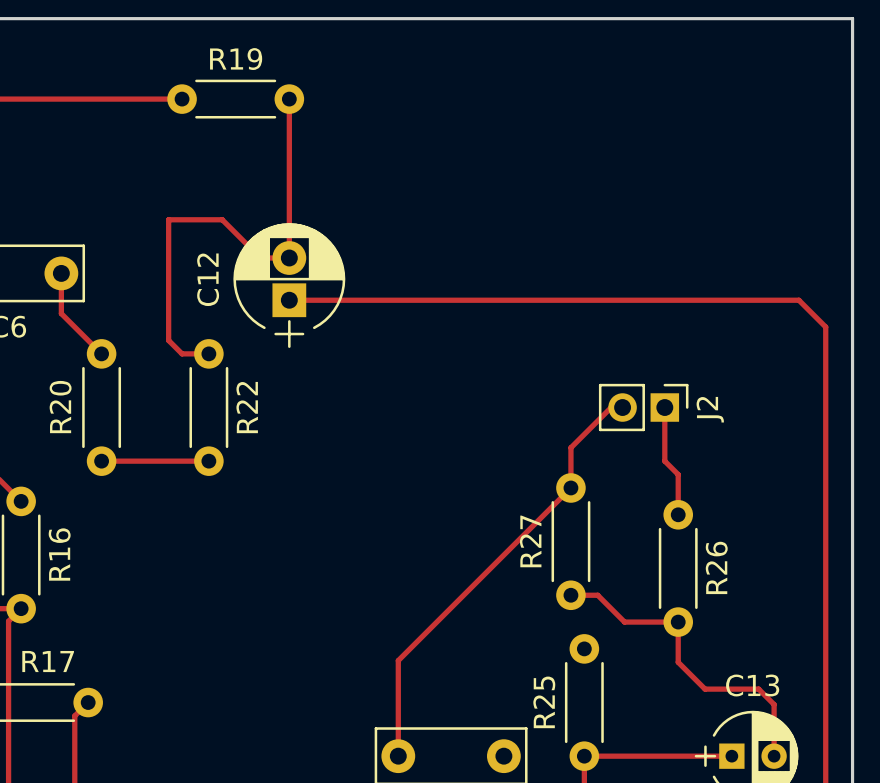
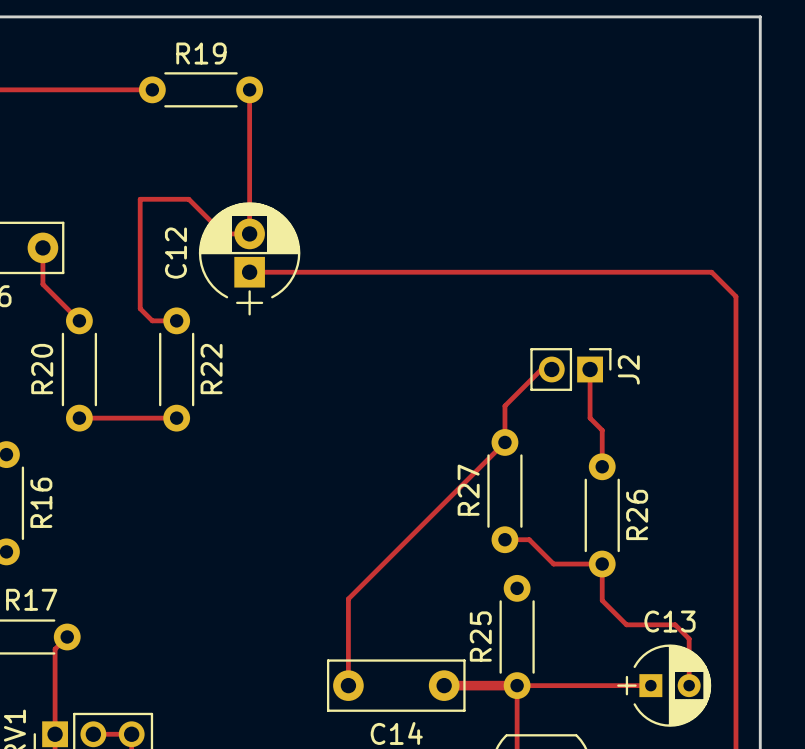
track: none -> (444, 685) (517, 685)

